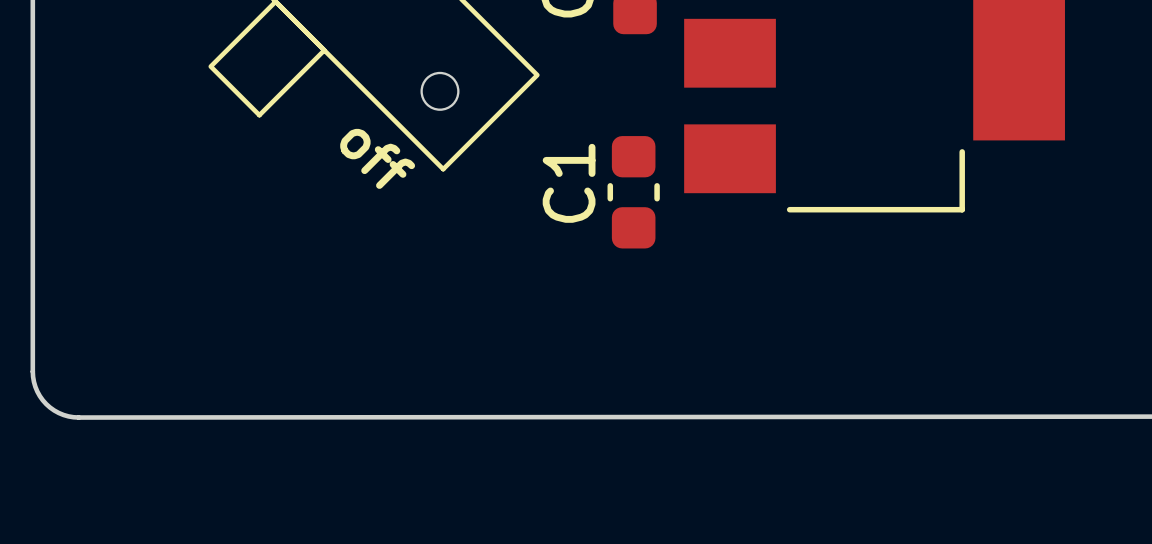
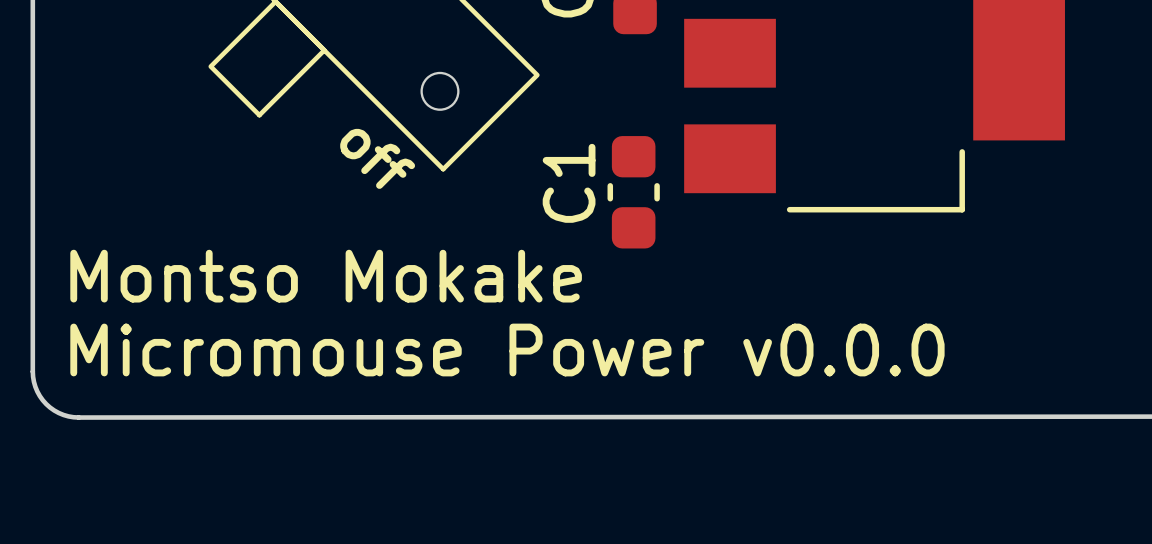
text: none -> Montso Mokake (326, 276)
text: none -> Micromouse Power v0.0.0 (507, 350)

